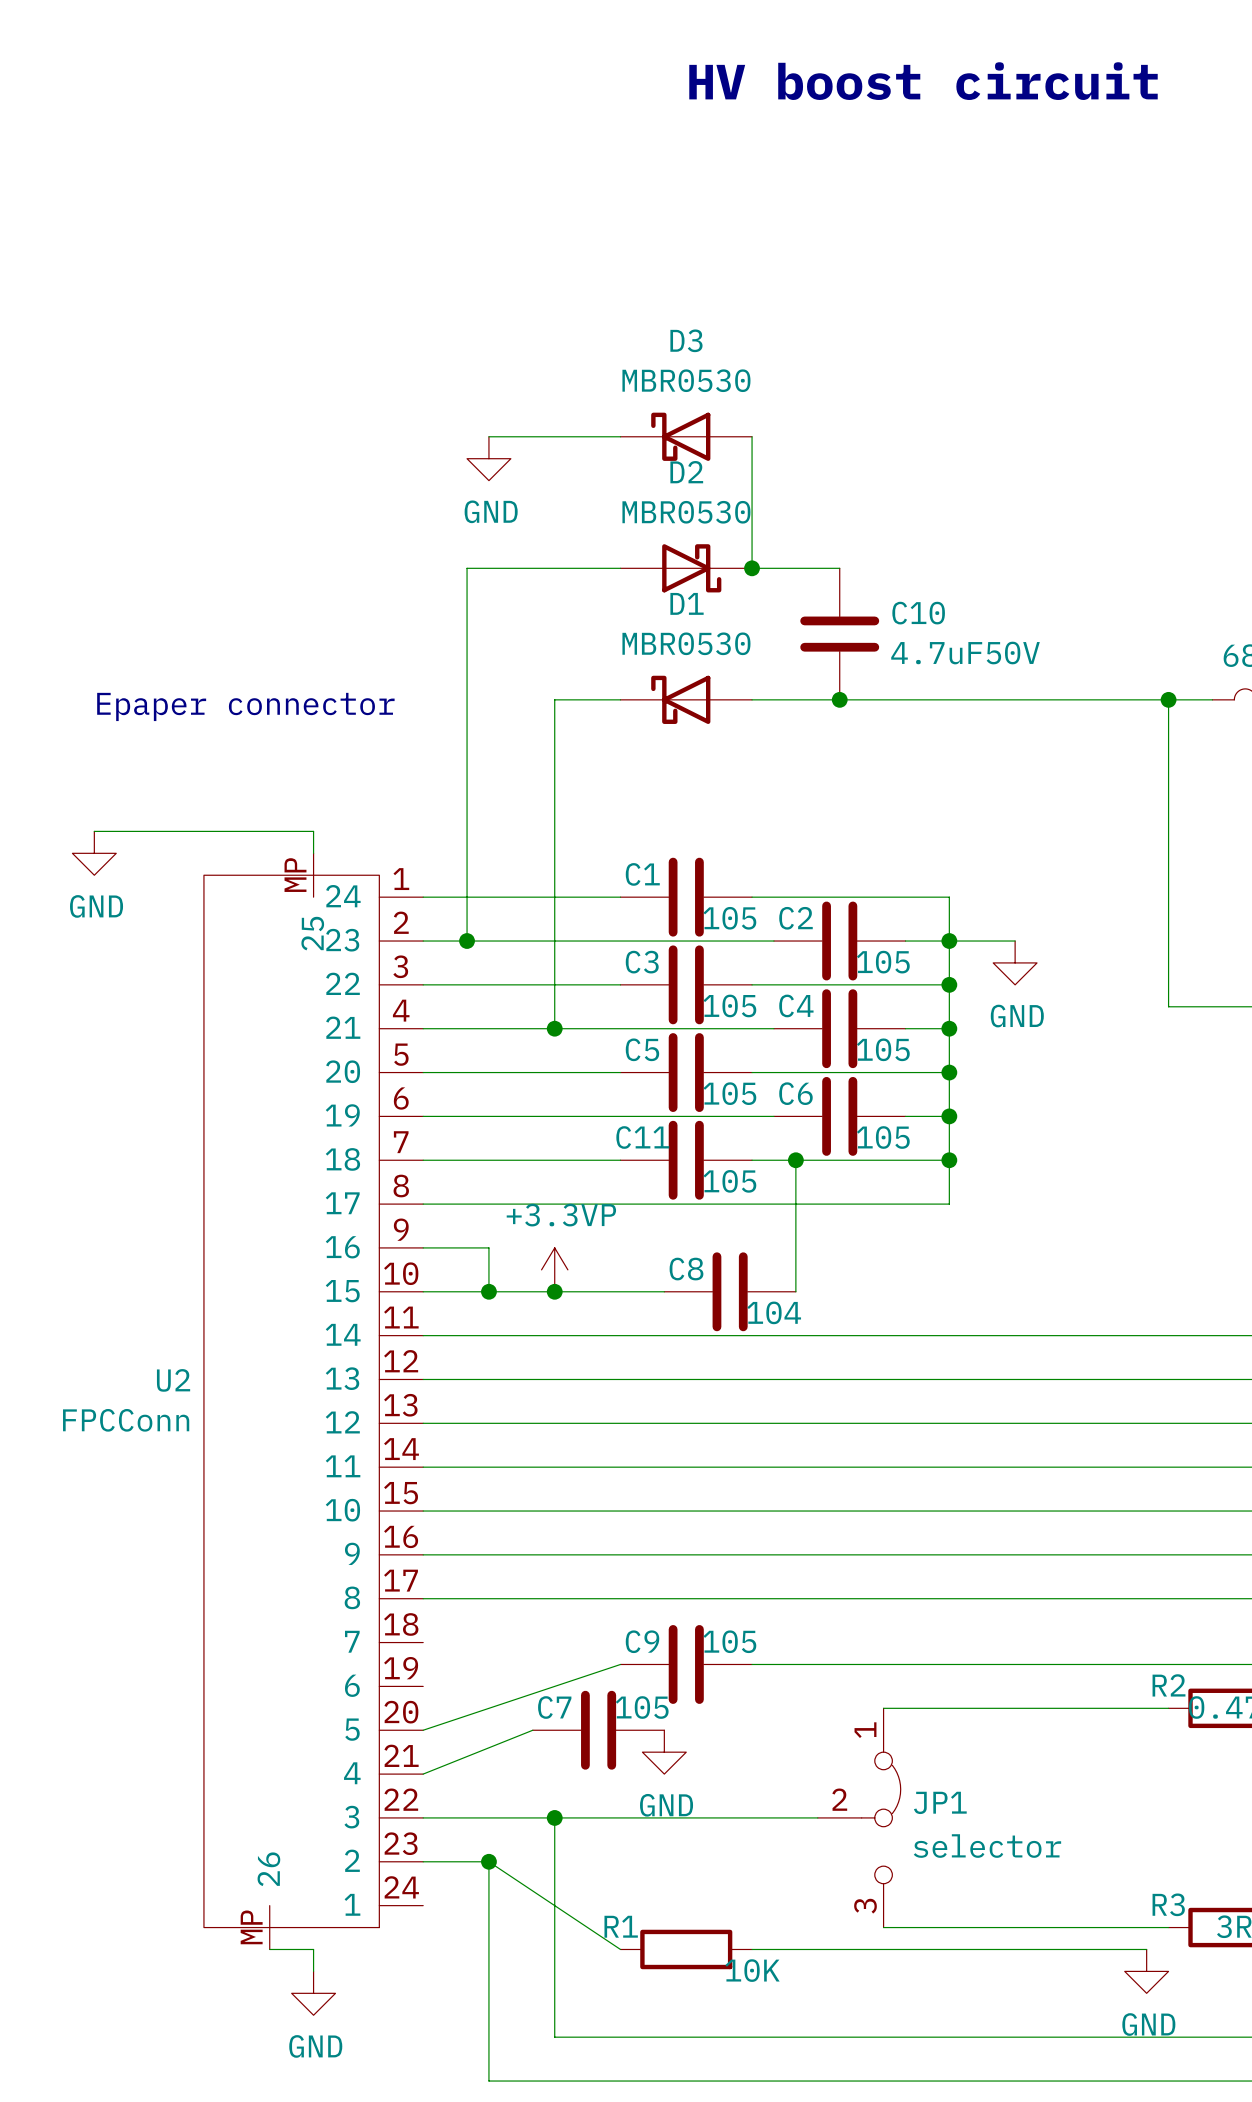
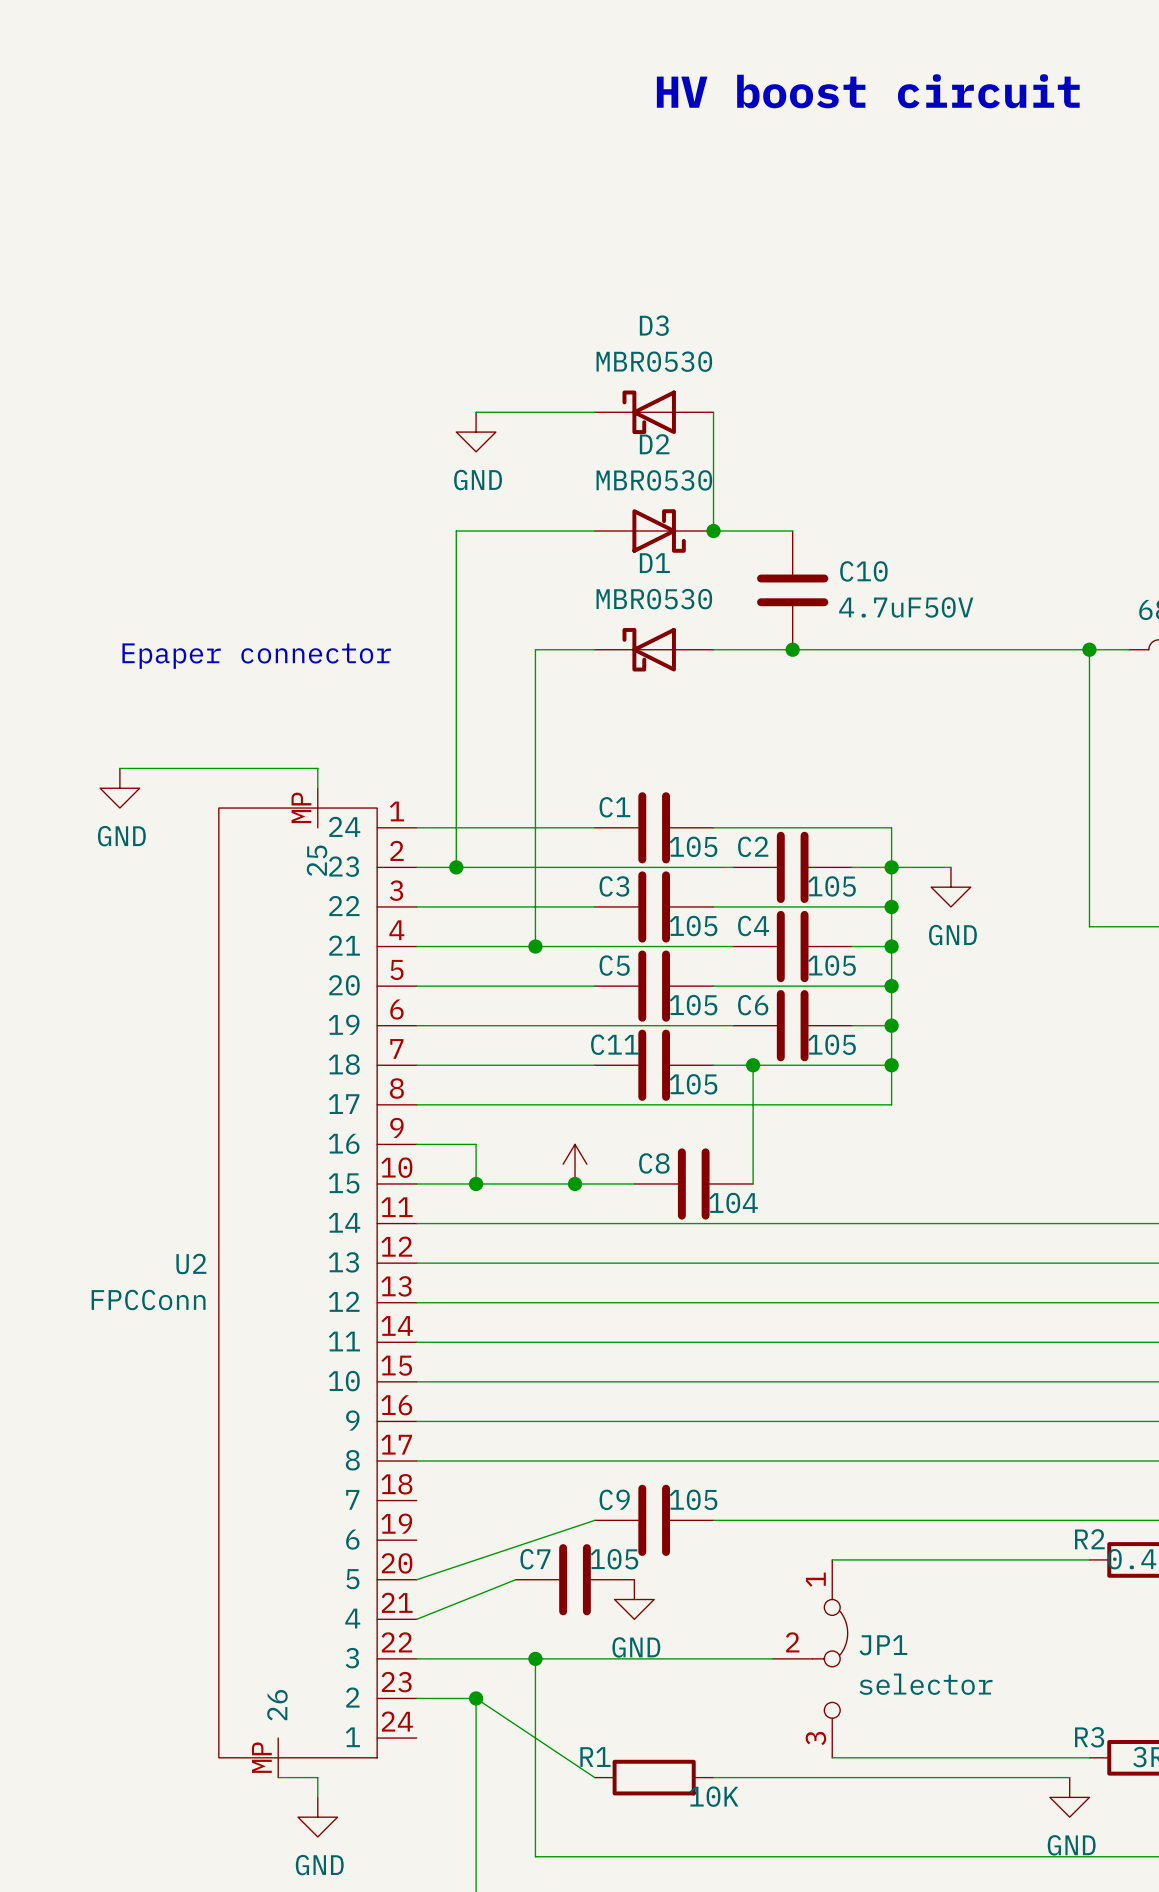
power symbol: +3.3VP (554, 1269) -> none
power symbol: none -> (575, 1164)
junction position: (554, 1291) -> (575, 1183)

